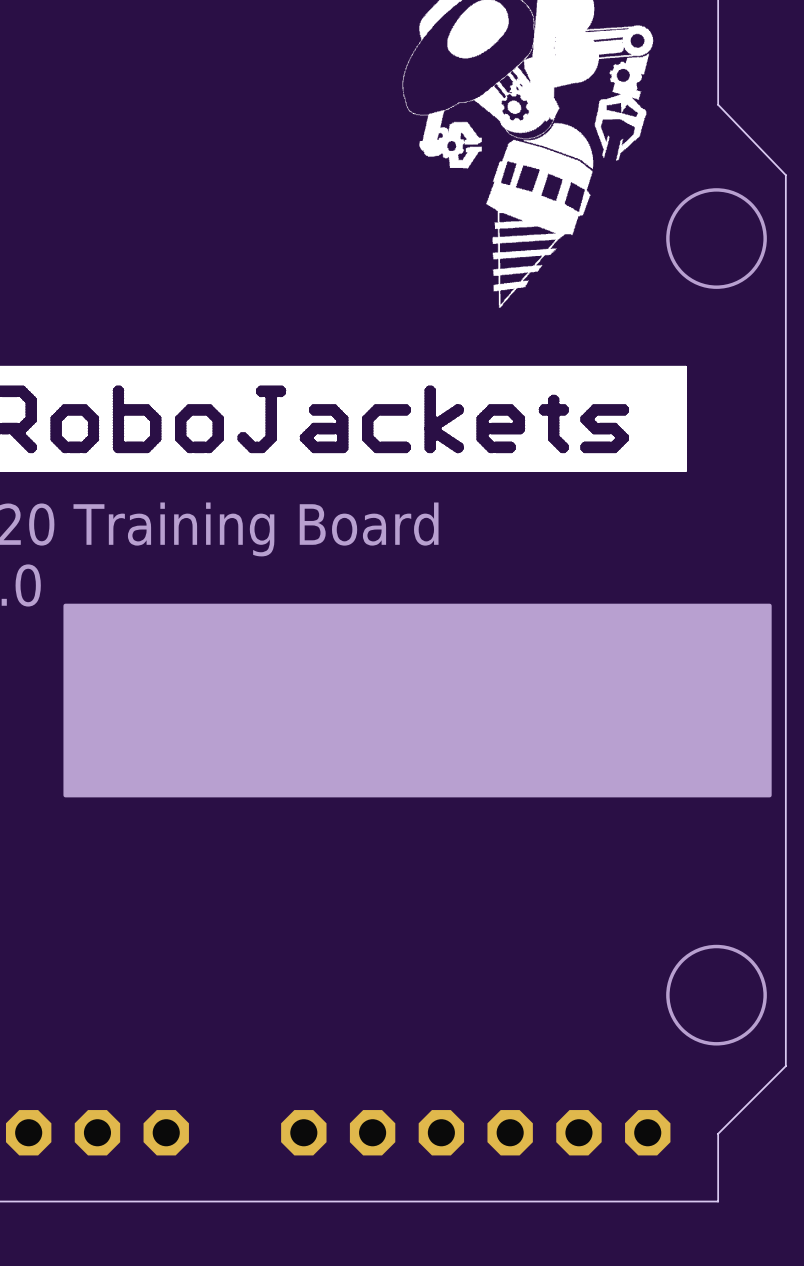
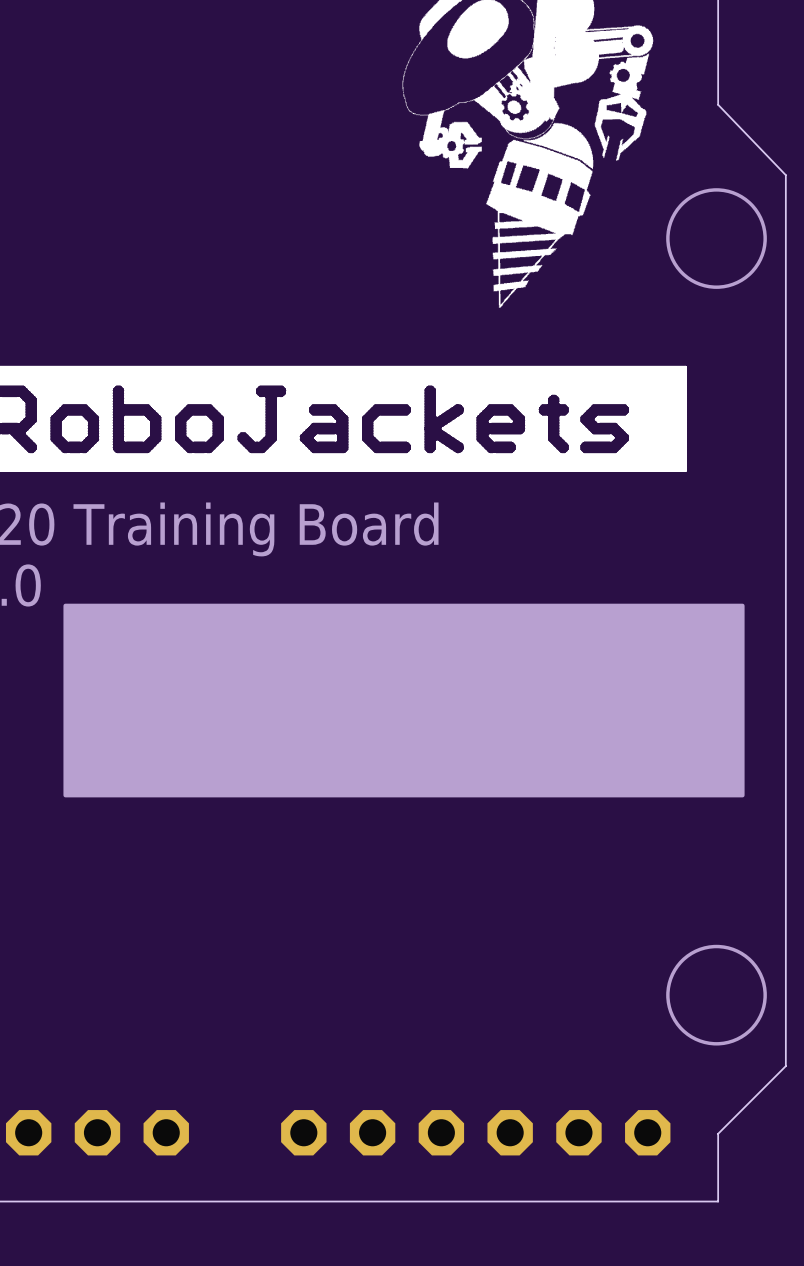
drawing shape: [63, 603, 772, 798] -> [63, 603, 745, 798]

